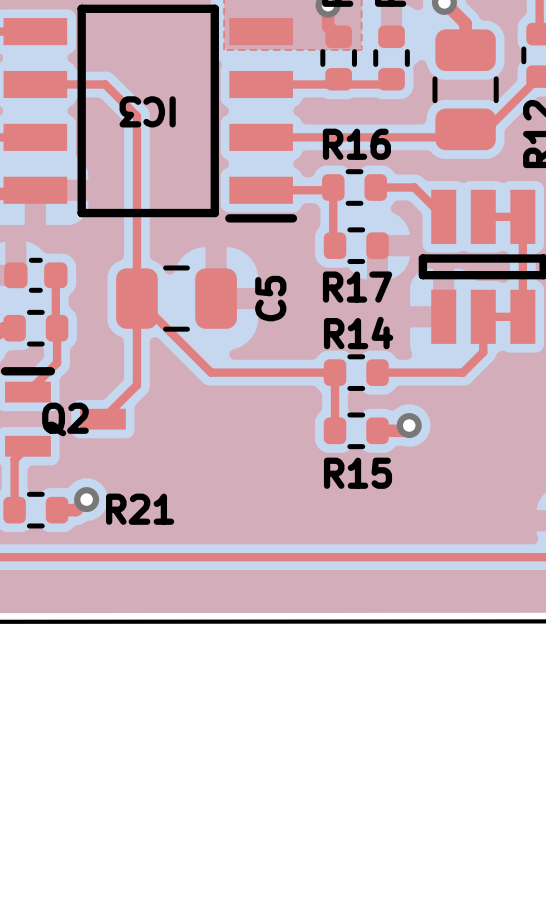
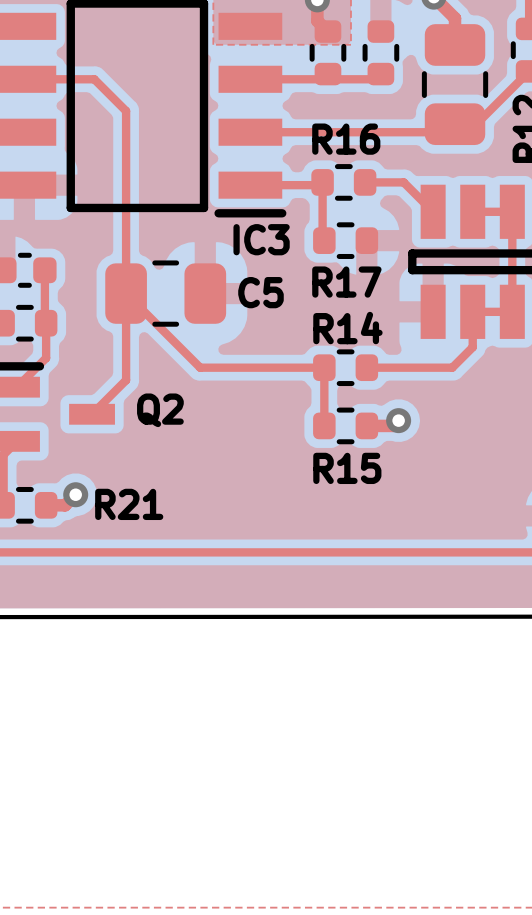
IC3 name rotation: 0° (147, 111) -> 180° (261, 239)
IC3 name position: IC3 (147, 111) -> IC3 (261, 239)
C5 name rotation: 0° (270, 298) -> 90° clockwise (260, 292)
Q2 name position: Q2 (65, 419) -> Q2 (160, 410)

